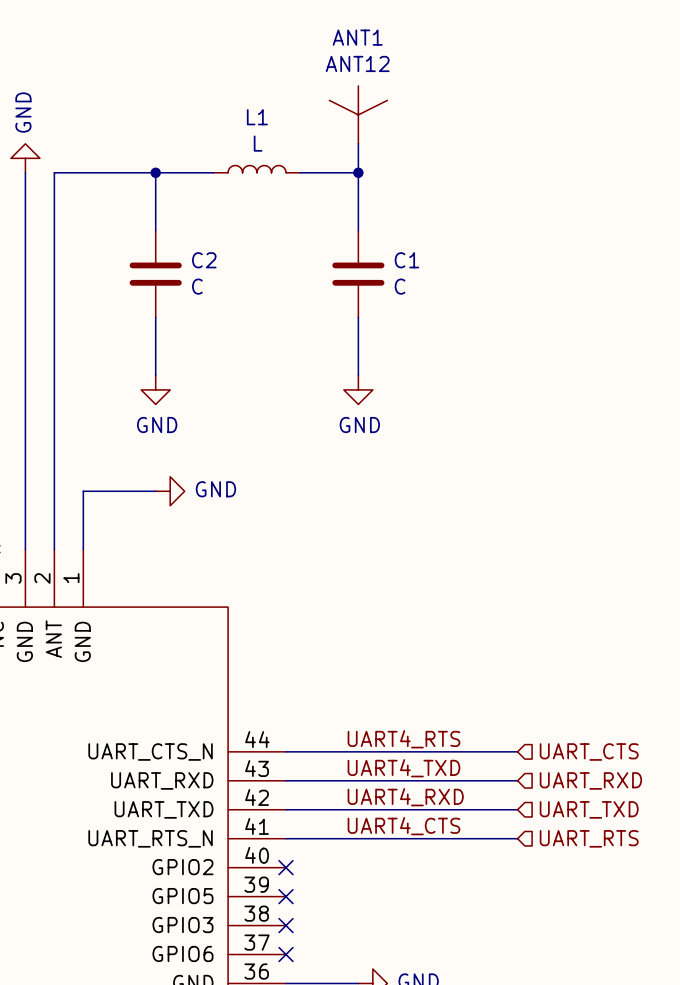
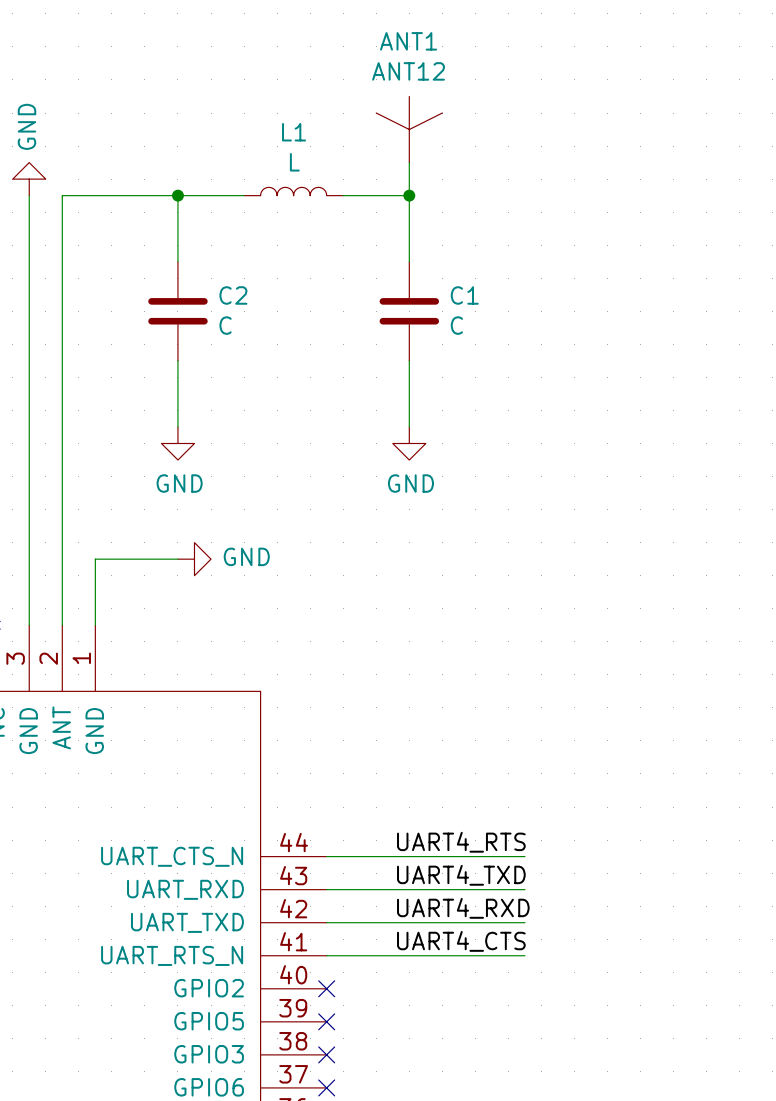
wire: (459, 751) (517, 751) -> none
hierarchical label: UART_CTS (589, 752) -> none
wire: (459, 780) (517, 780) -> none
hierarchical label: UART_RXD (590, 780) -> none
wire: (459, 809) (517, 809) -> none
hierarchical label: UART_TXD (589, 809) -> none
wire: (459, 838) (517, 838) -> none
hierarchical label: UART_RTS (589, 838) -> none

